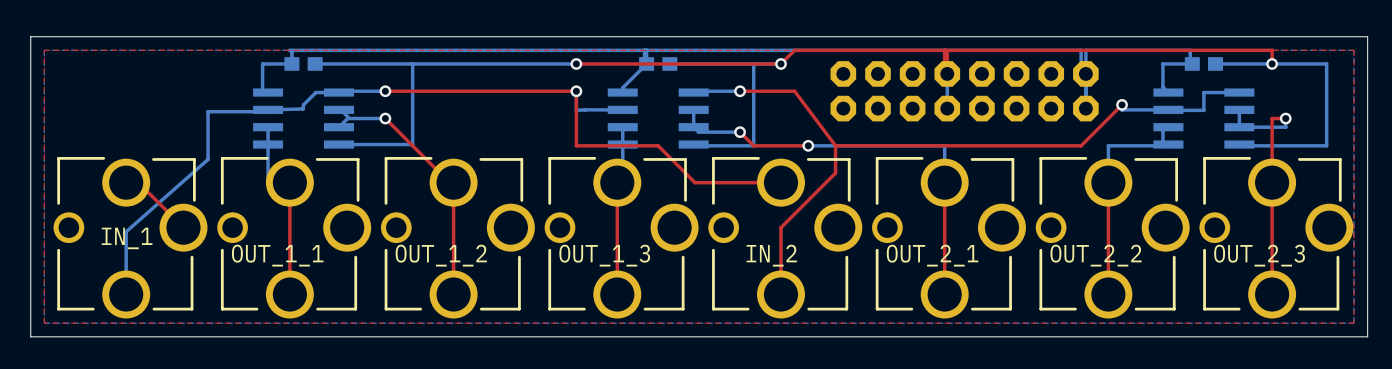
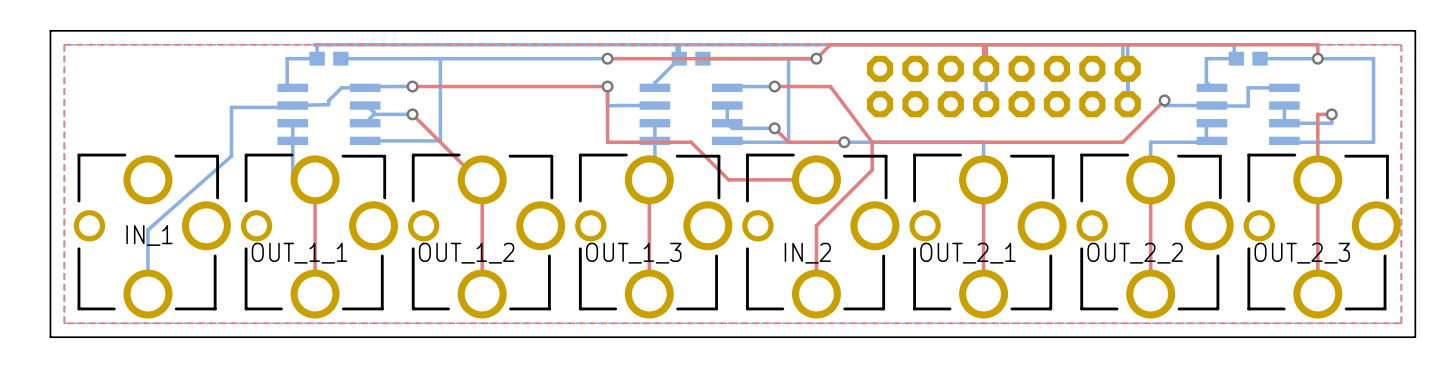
top track: (138, 182) (183, 227) -> none

